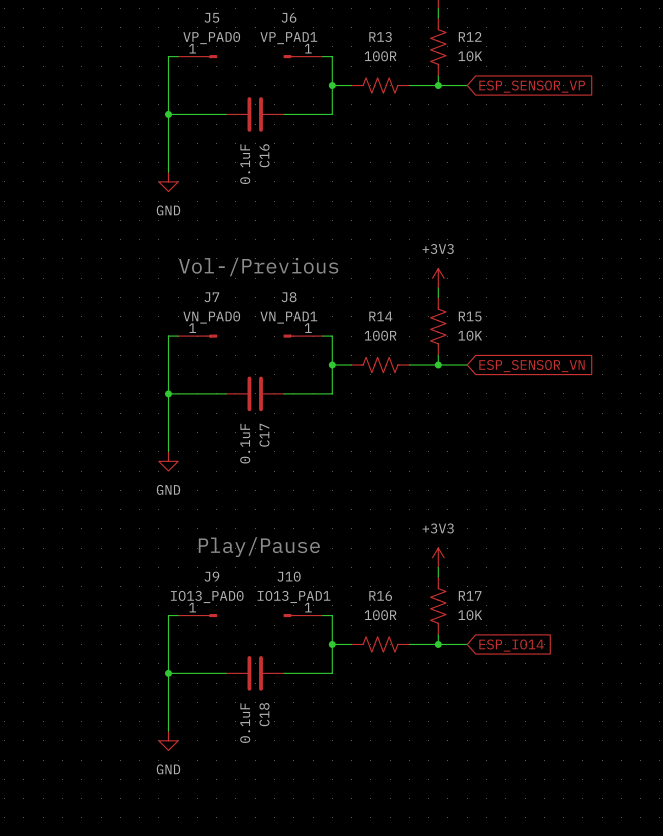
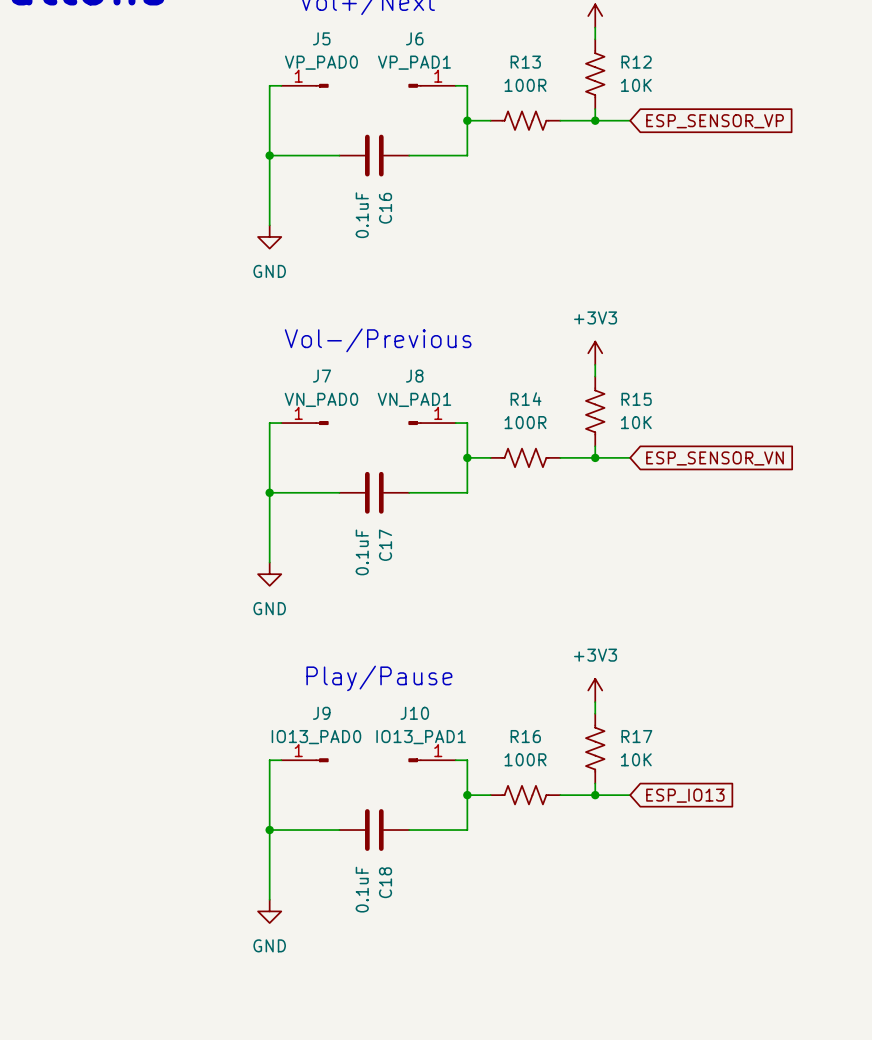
global label: ESP_IO14 (511, 645) -> ESP_IO13 (685, 795)

